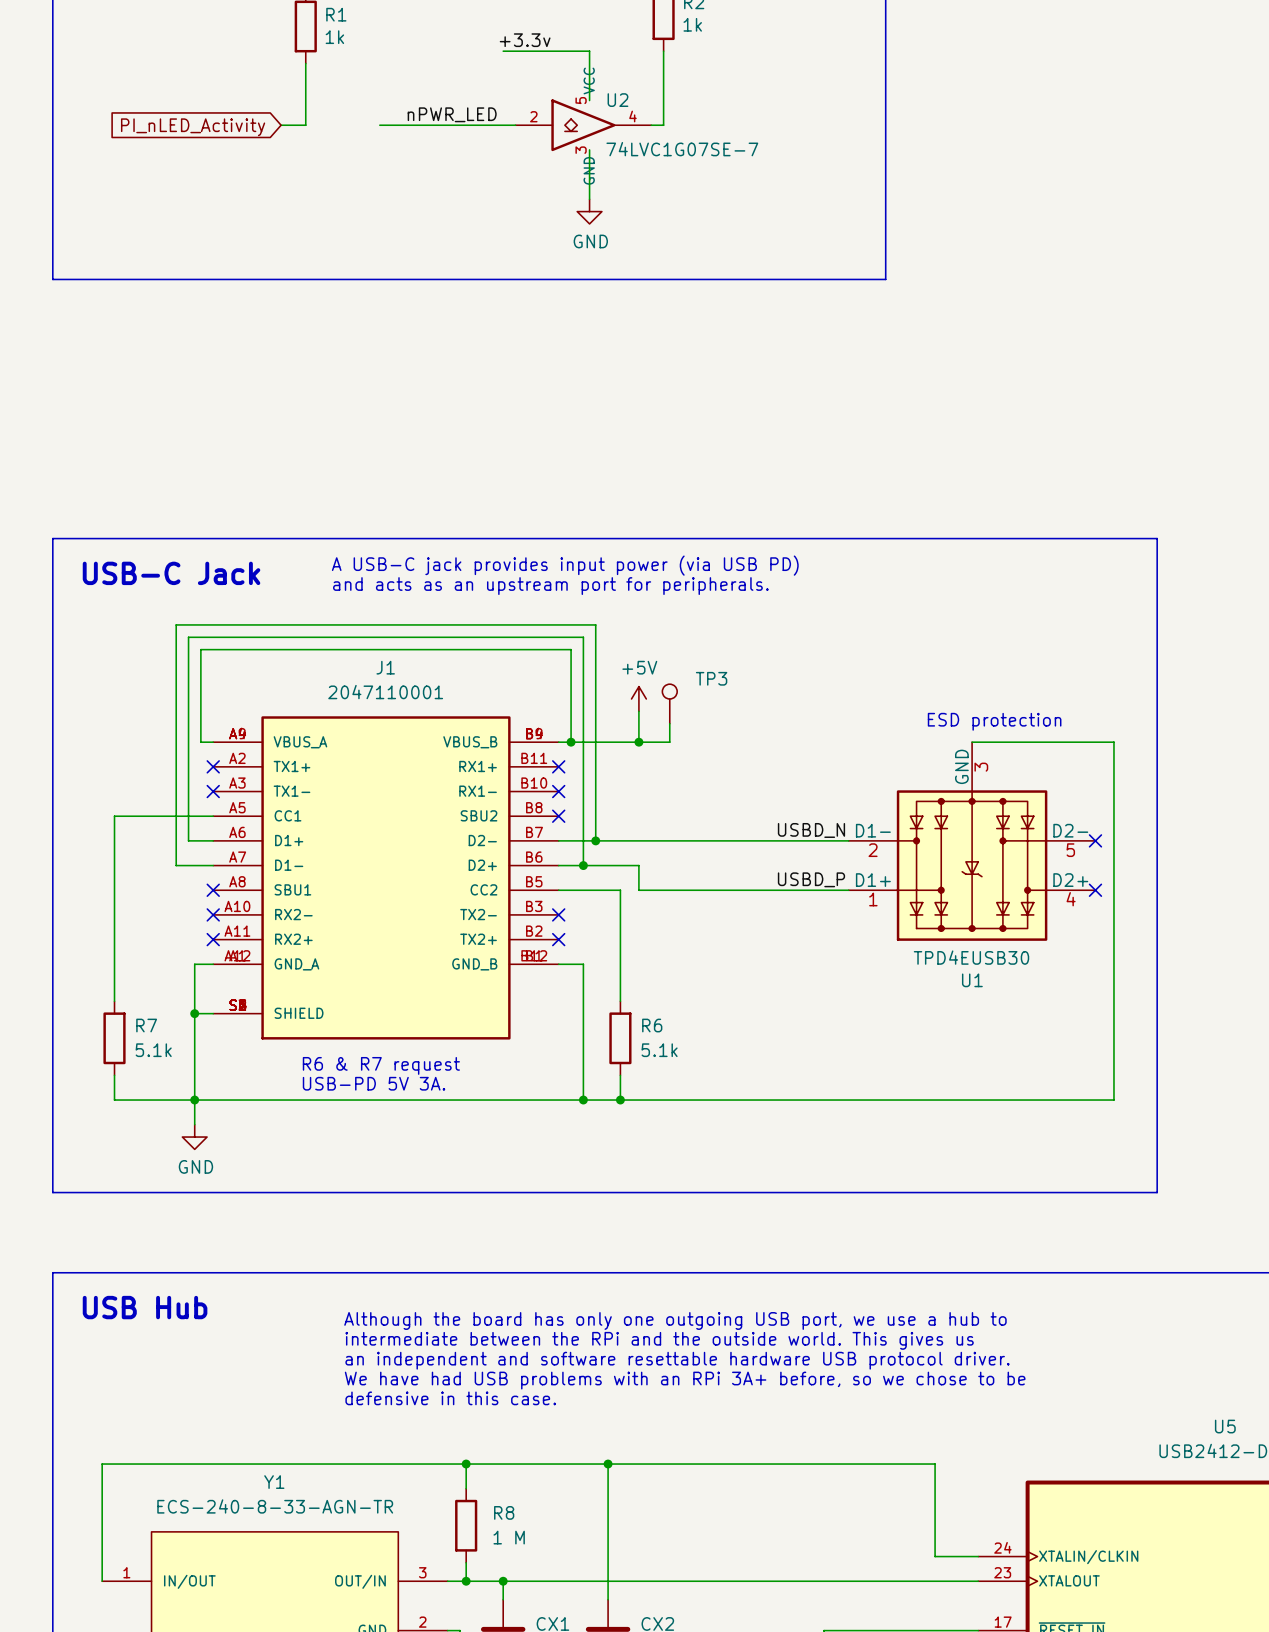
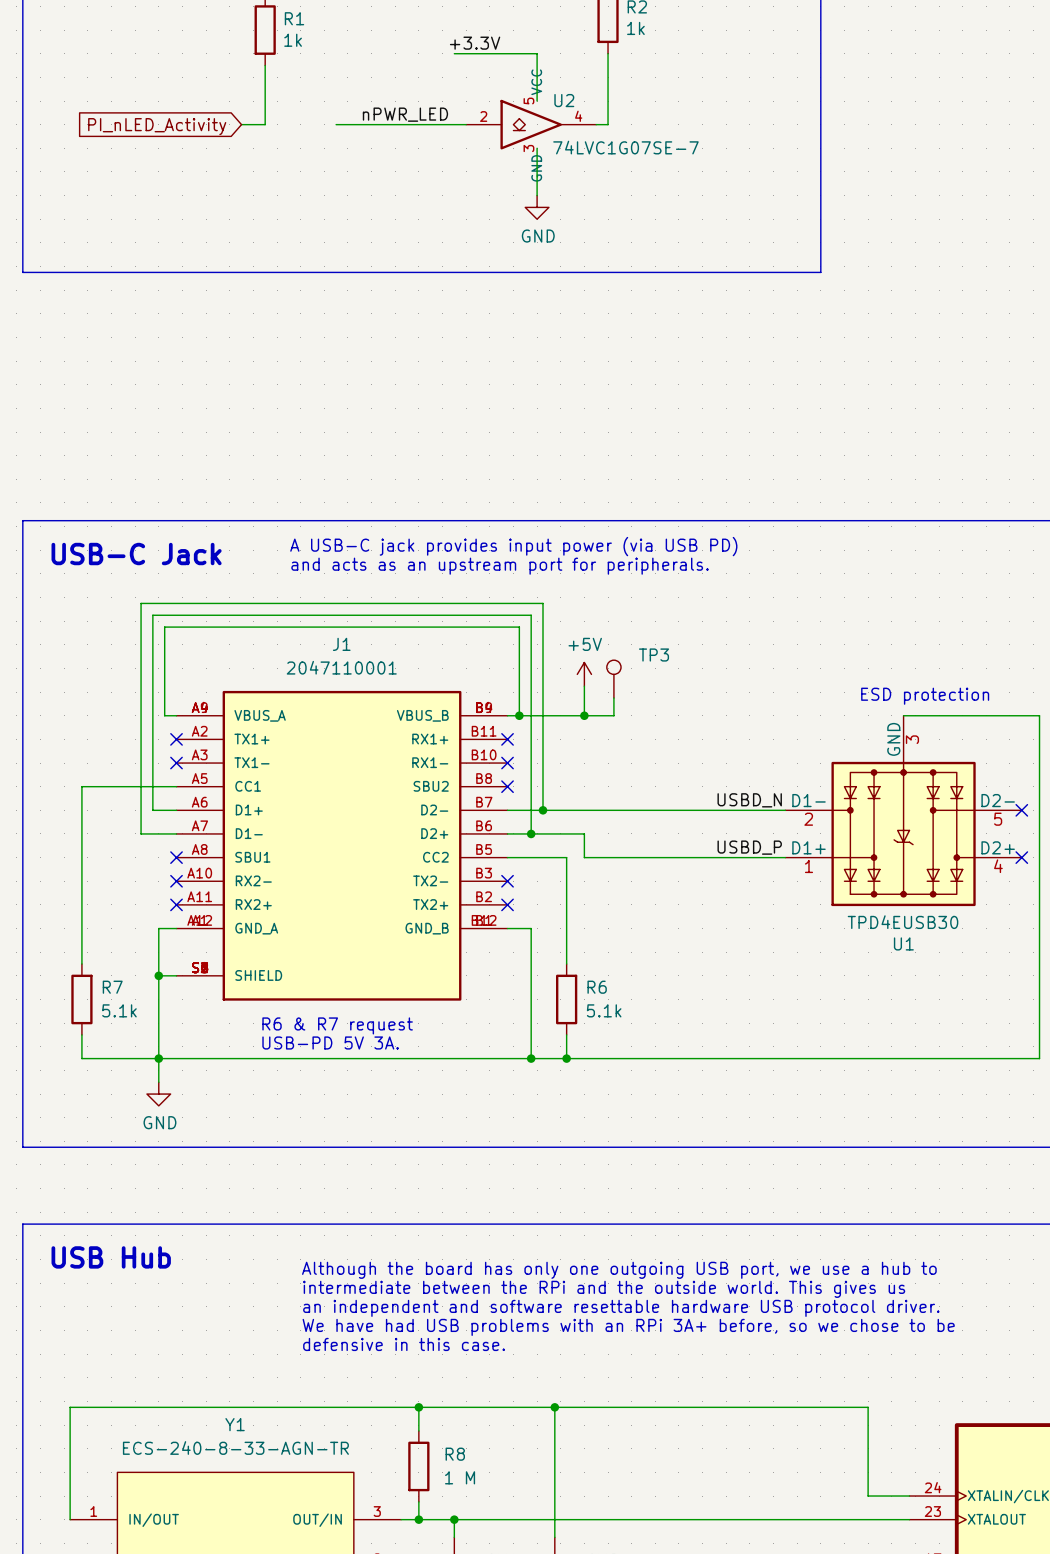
label: +3.3v (525, 40) -> +3.3V (475, 43)

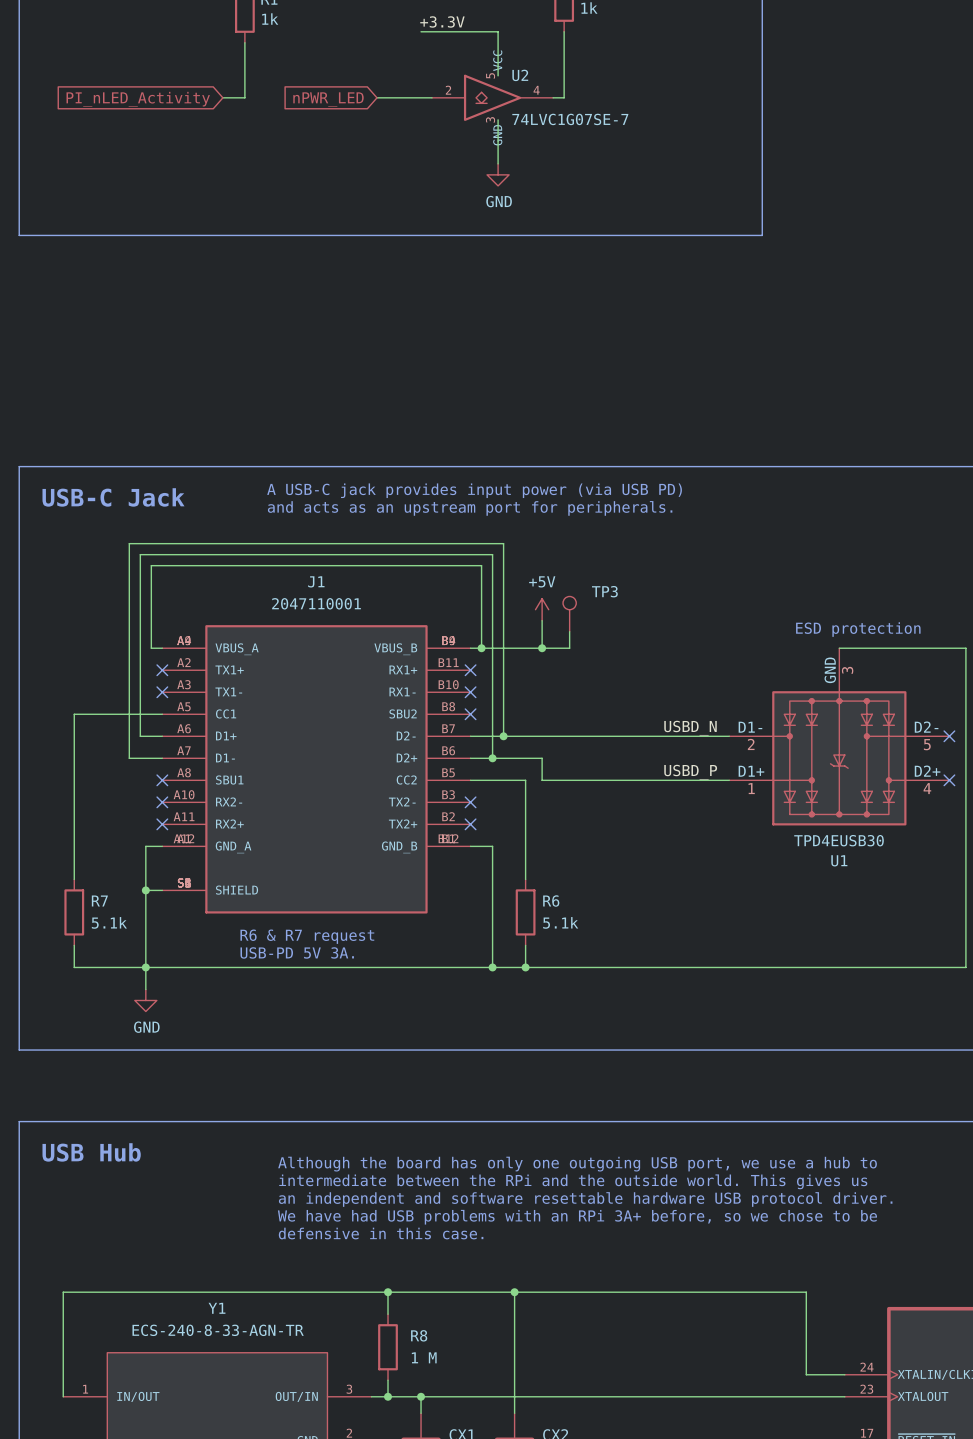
label: nPWR_LED (405, 114) -> none
wire: (336, 124) (407, 124) -> none
global label: none -> nPWR_LED (328, 99)

